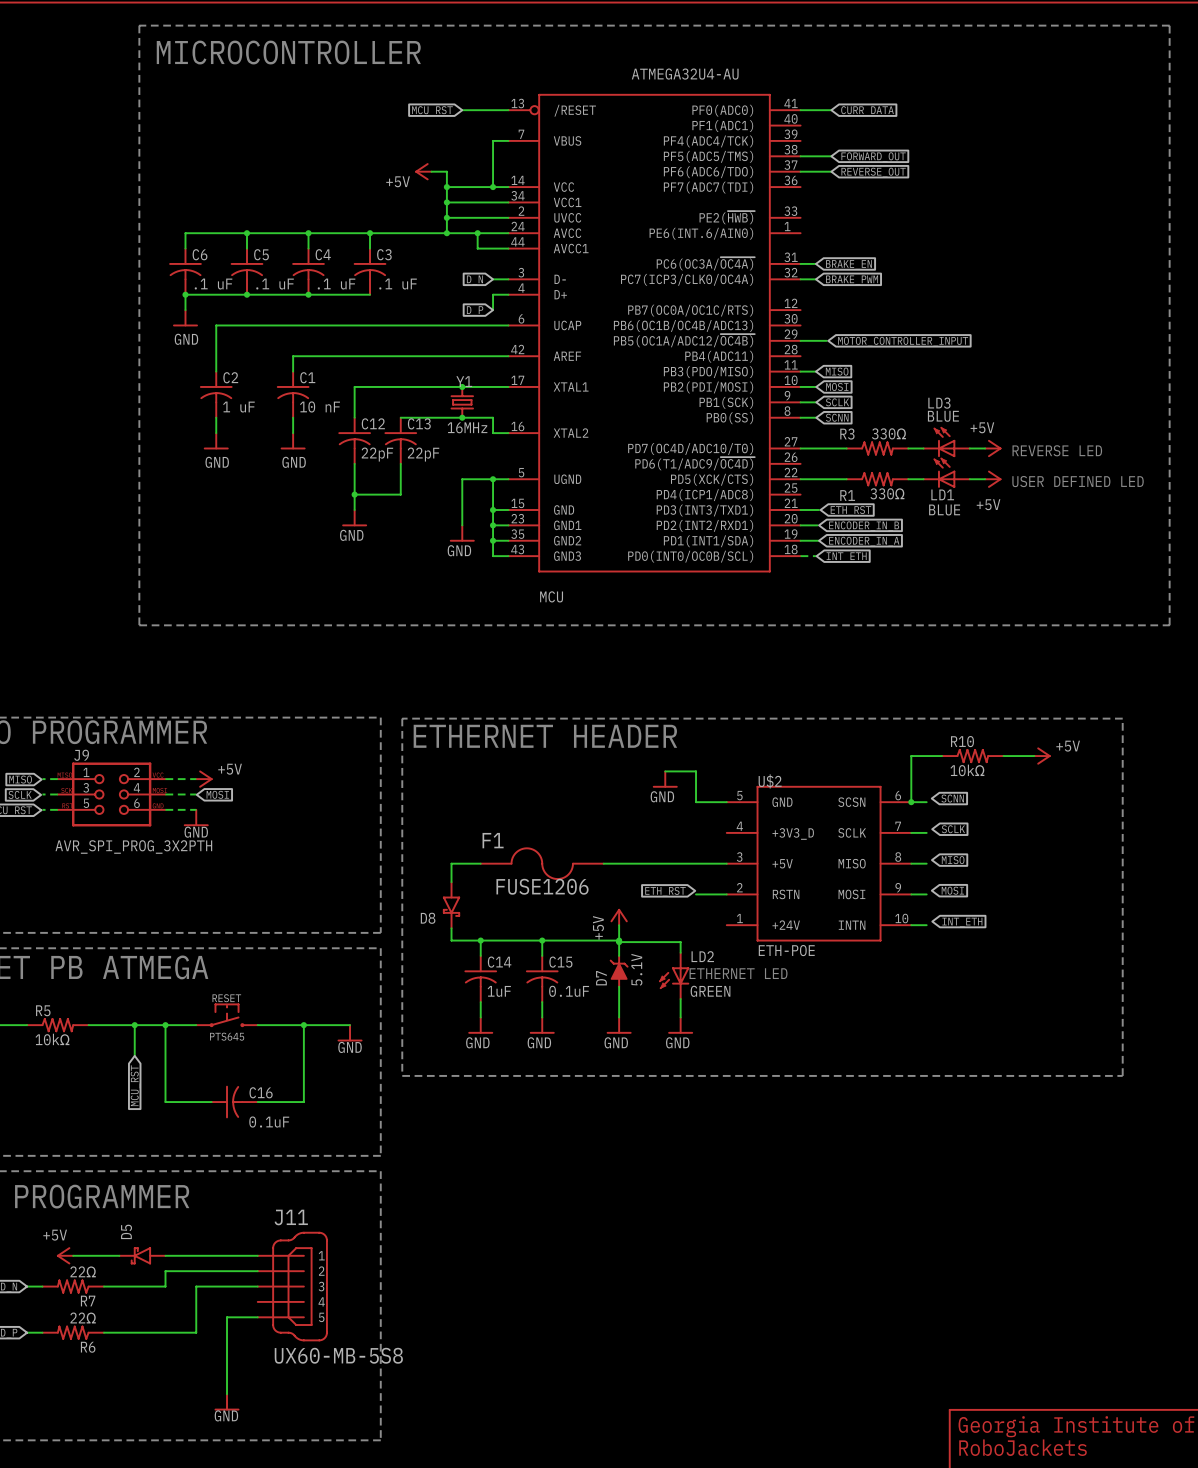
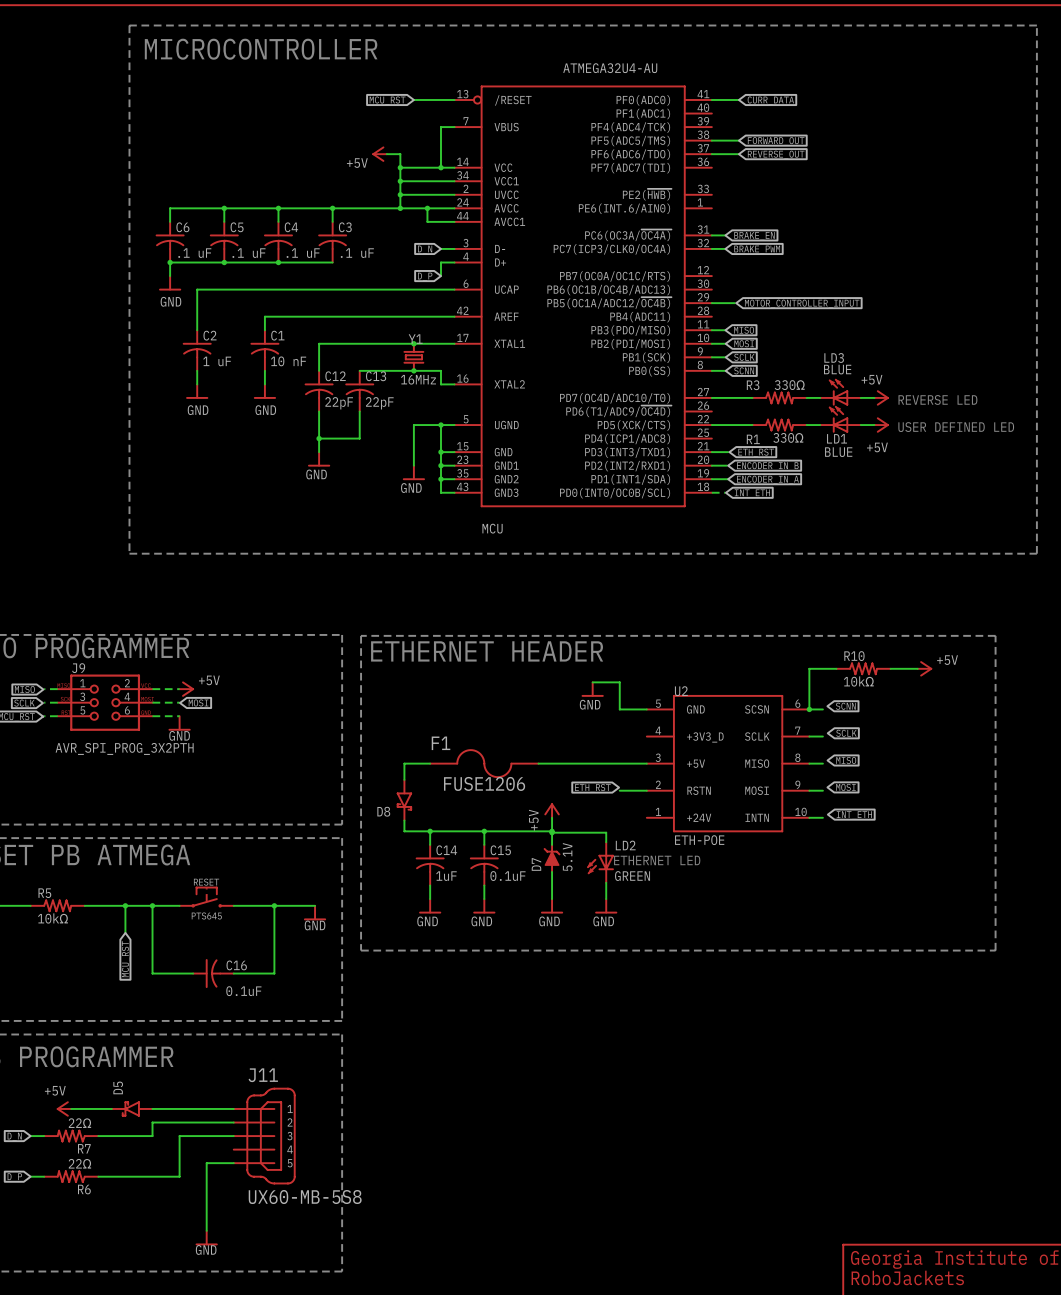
U$2 name: U$2 (770, 781) -> U2 (681, 691)

